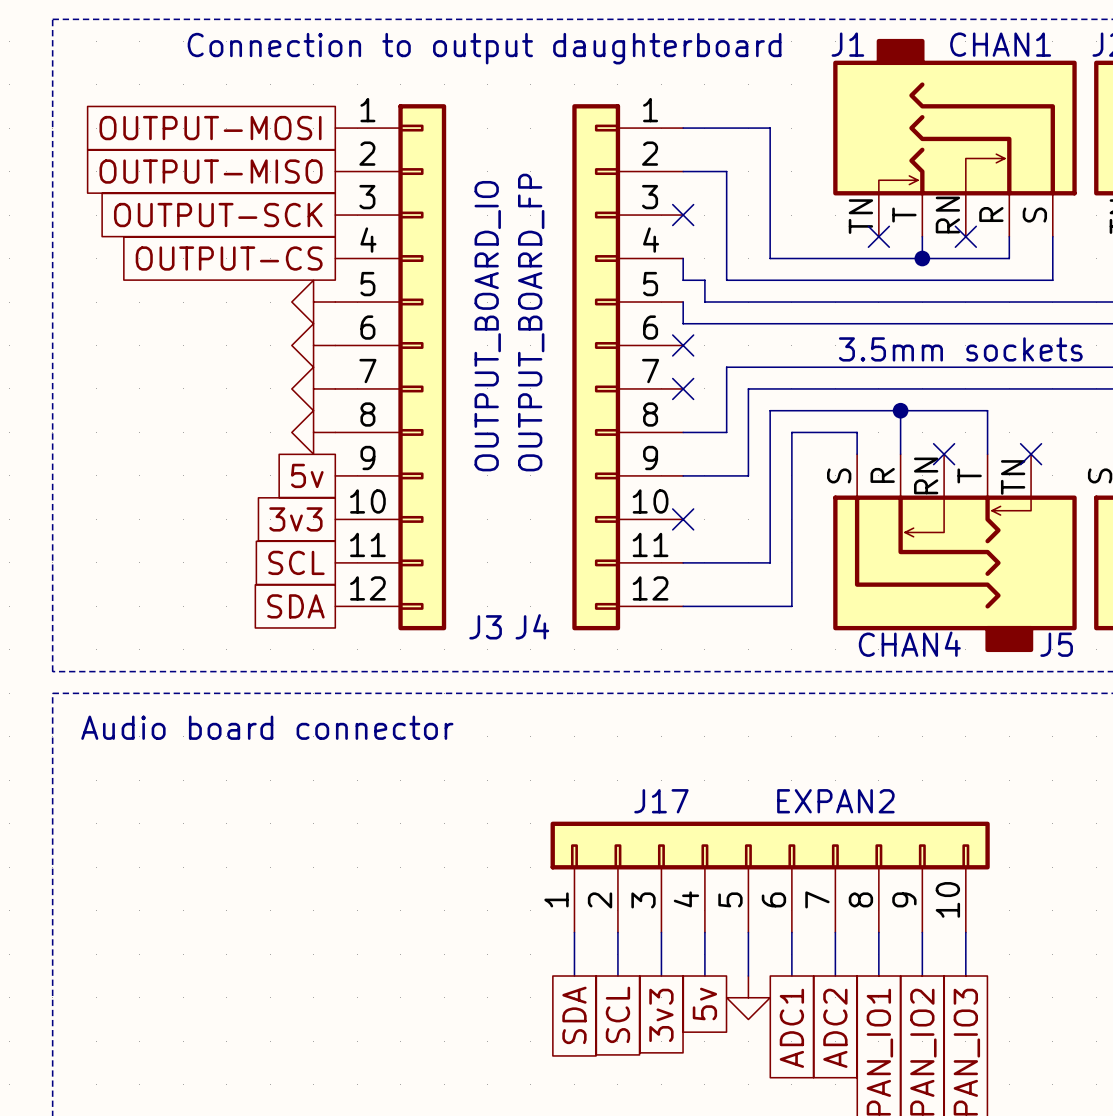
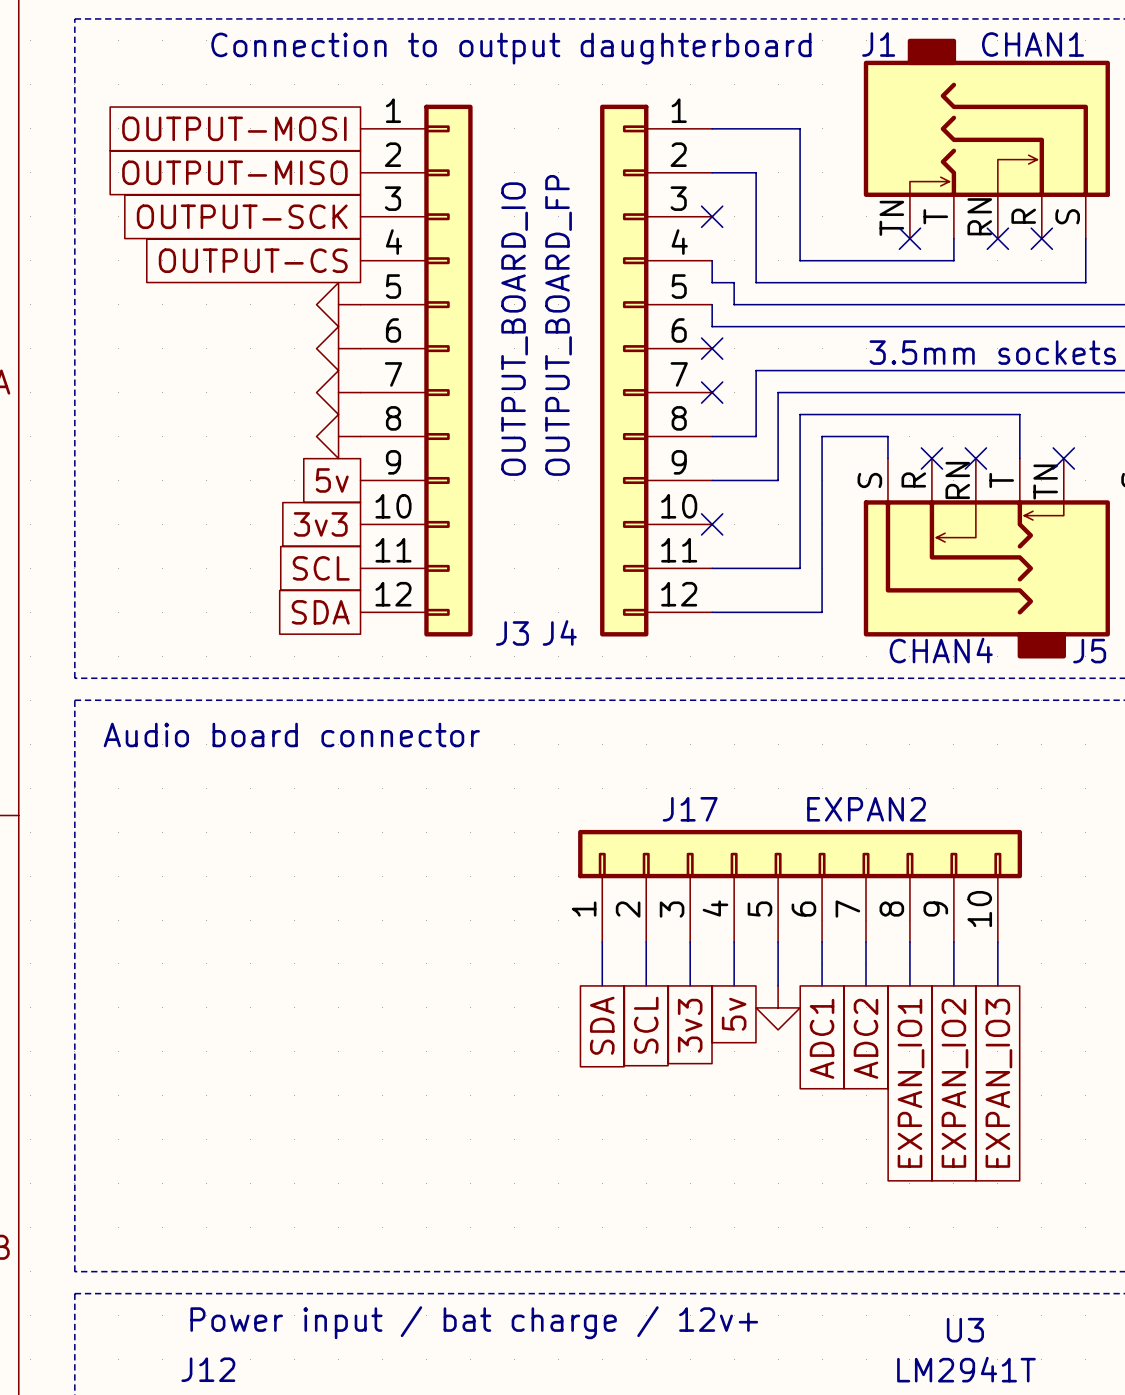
wire: (1009, 236) (1009, 258) (922, 258) -> none
no-connect mark: none -> (1041, 238)
junction: (922, 258) -> none
wire: (900, 410) (900, 454) -> none
junction: (900, 410) -> none
no-connect mark: none -> (931, 458)

